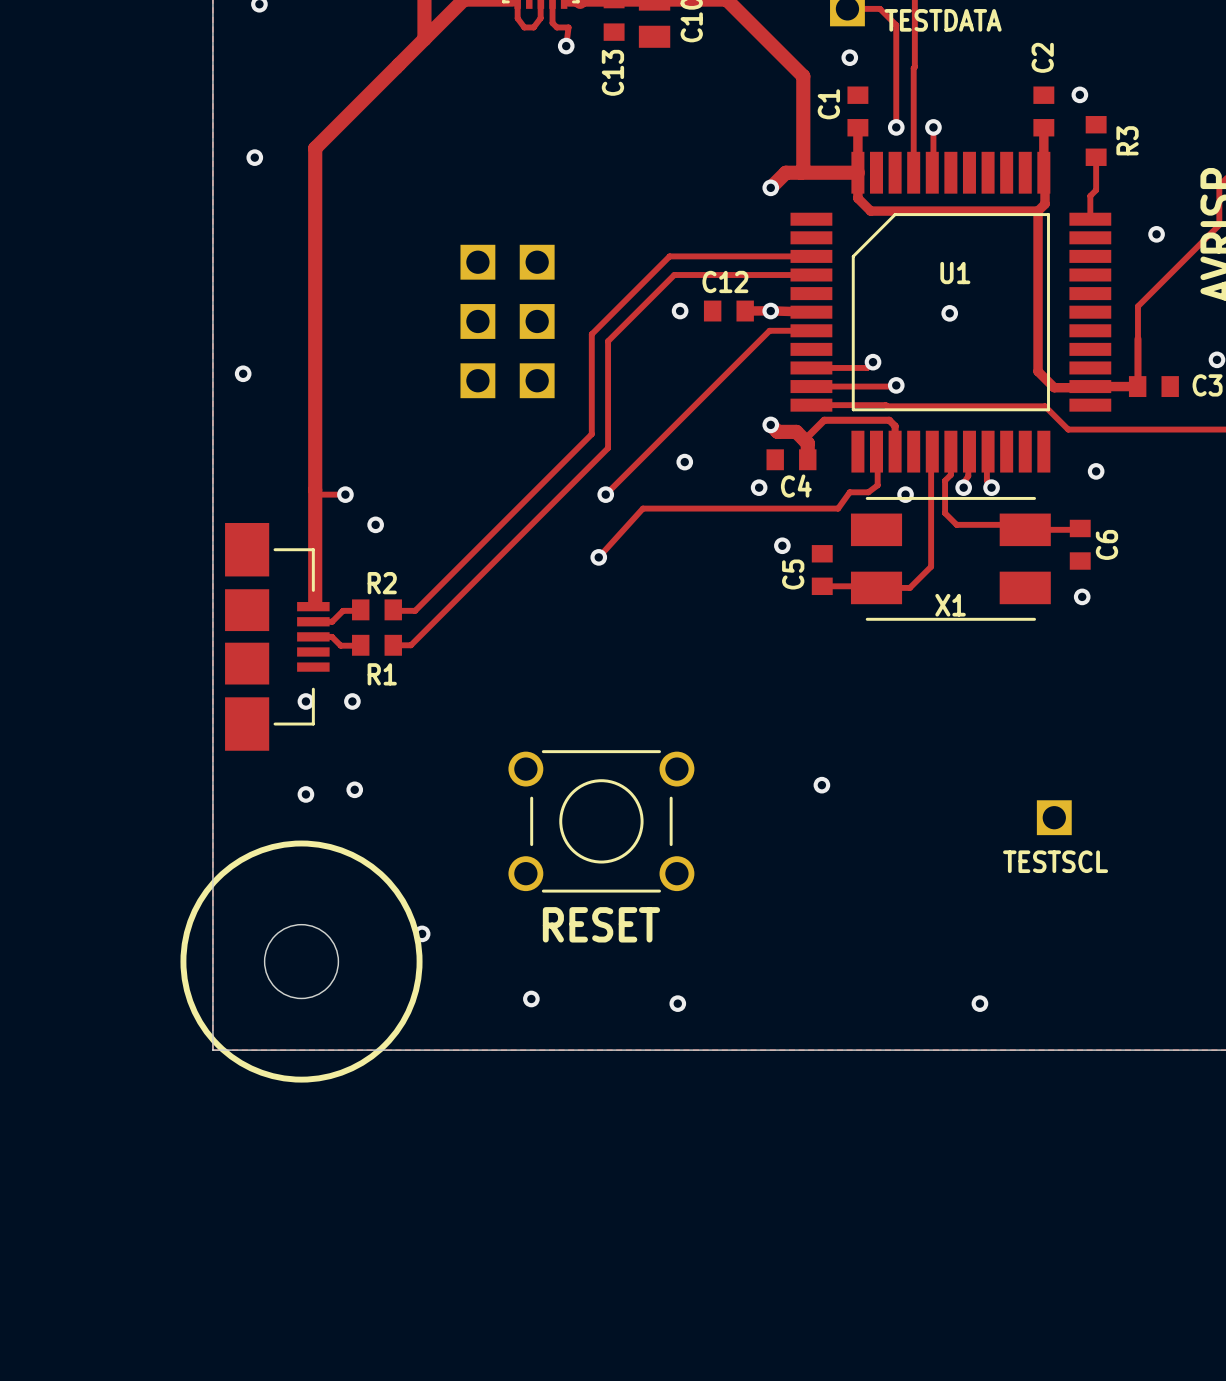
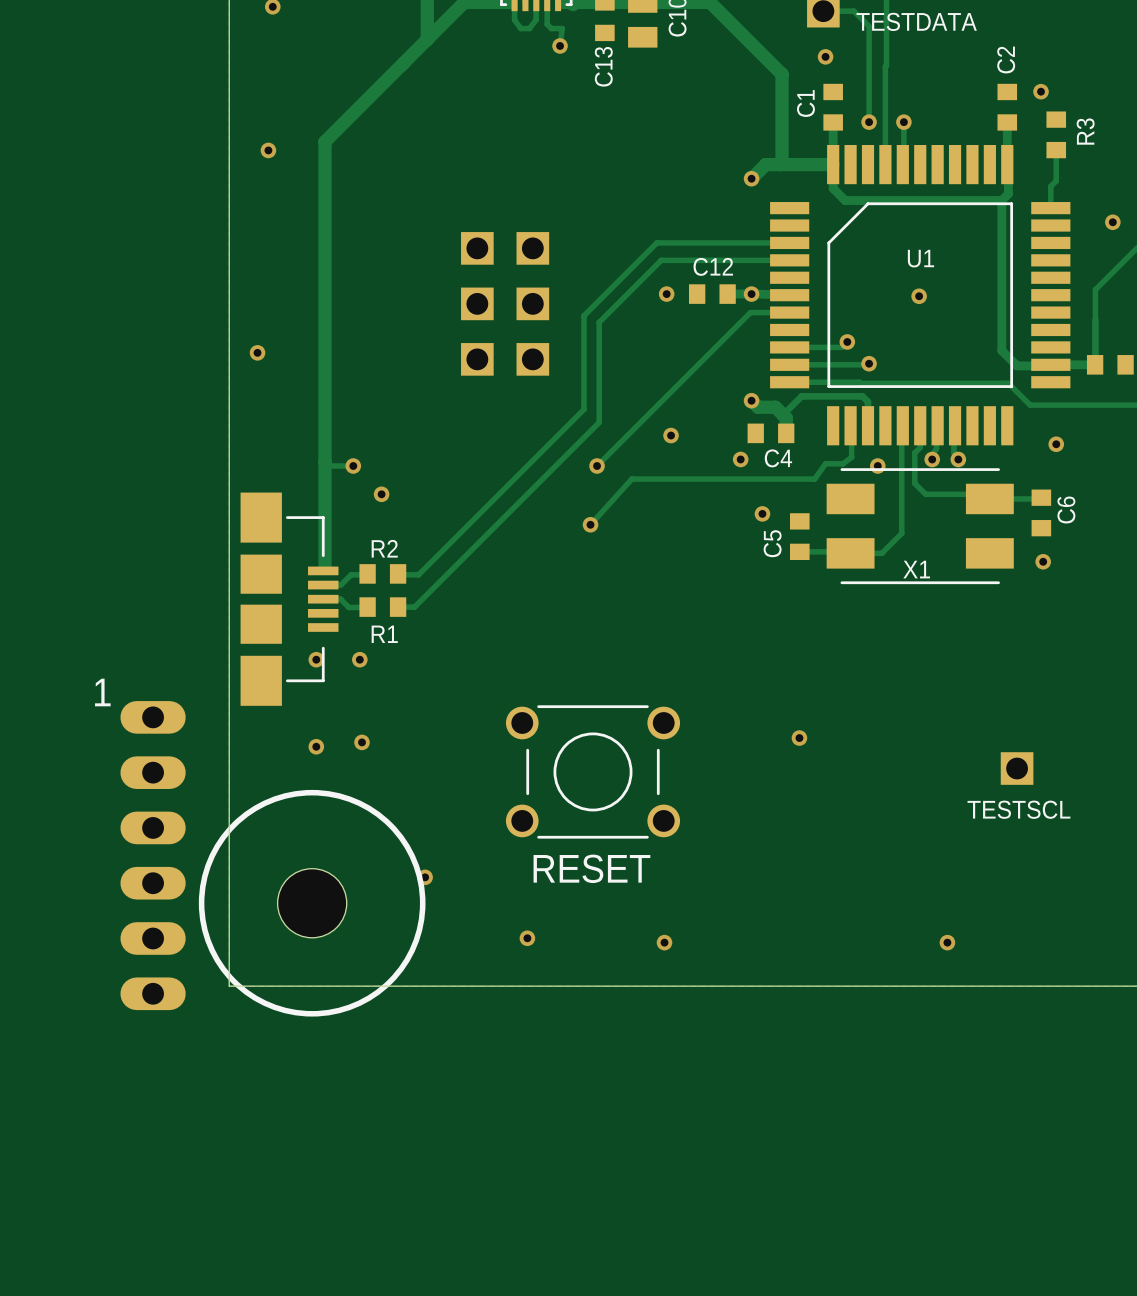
part: none -> (153, 855)

